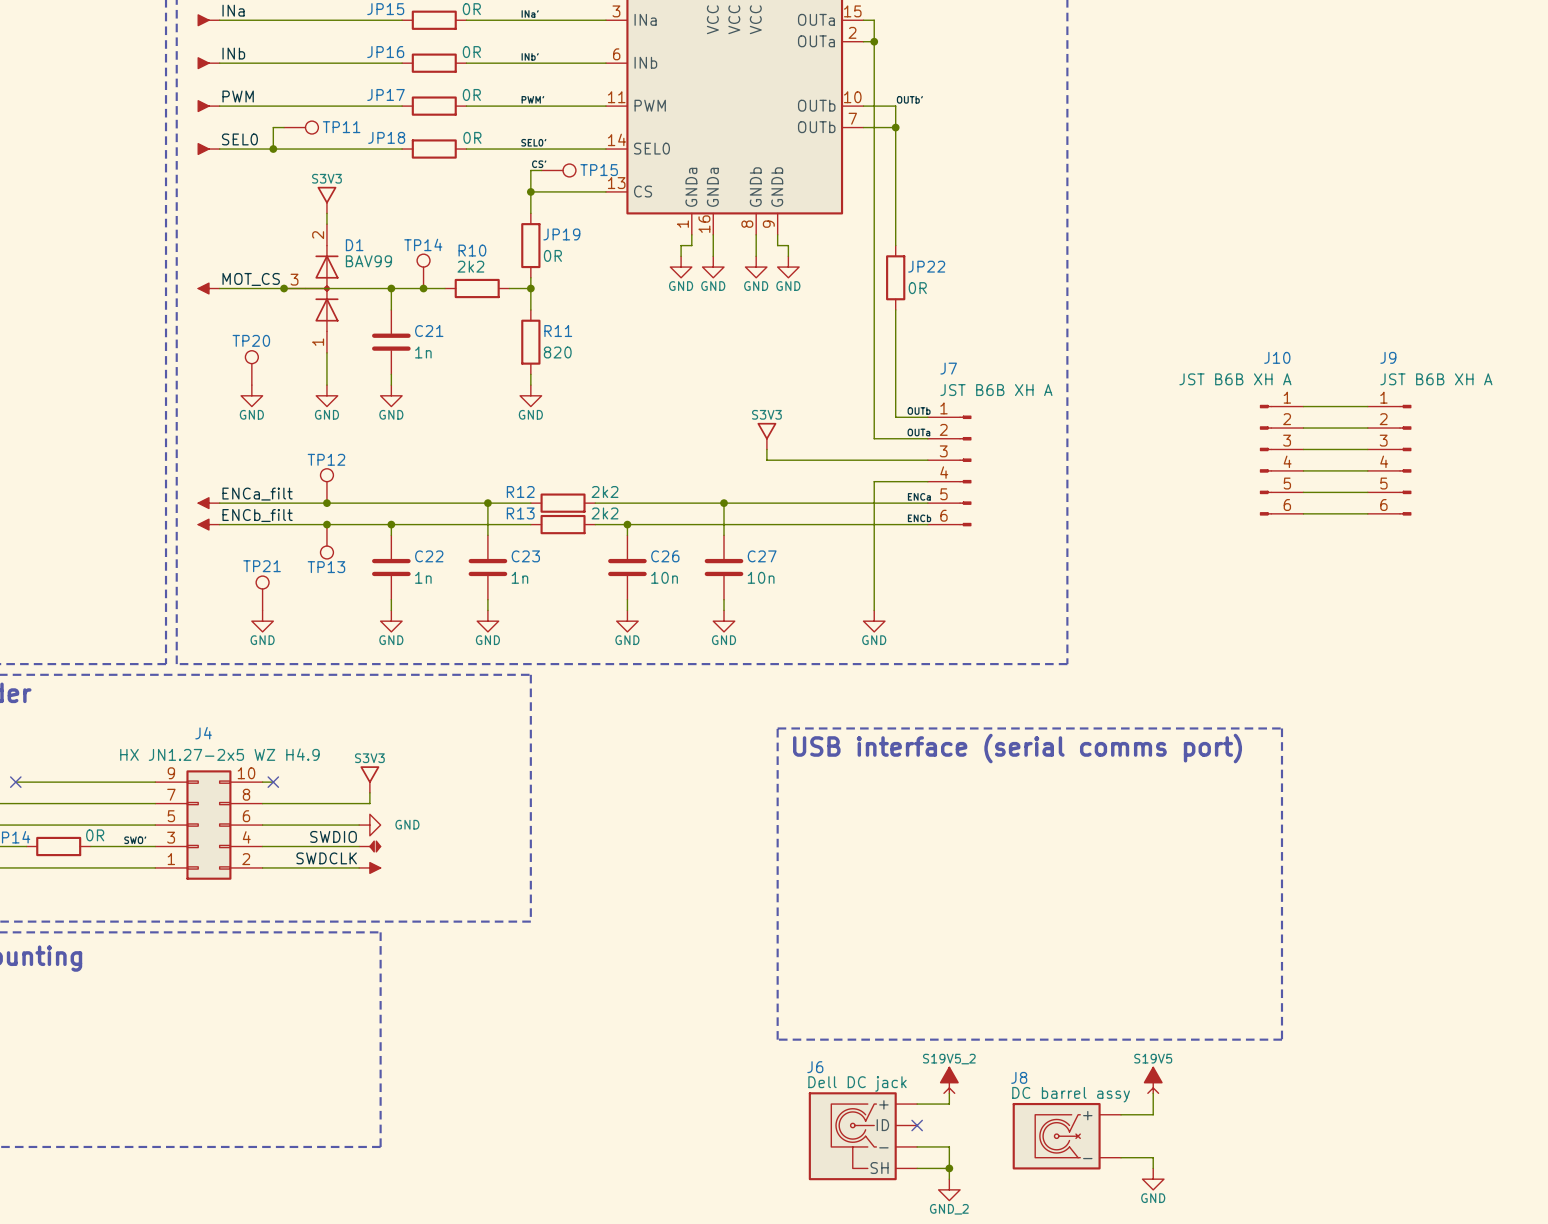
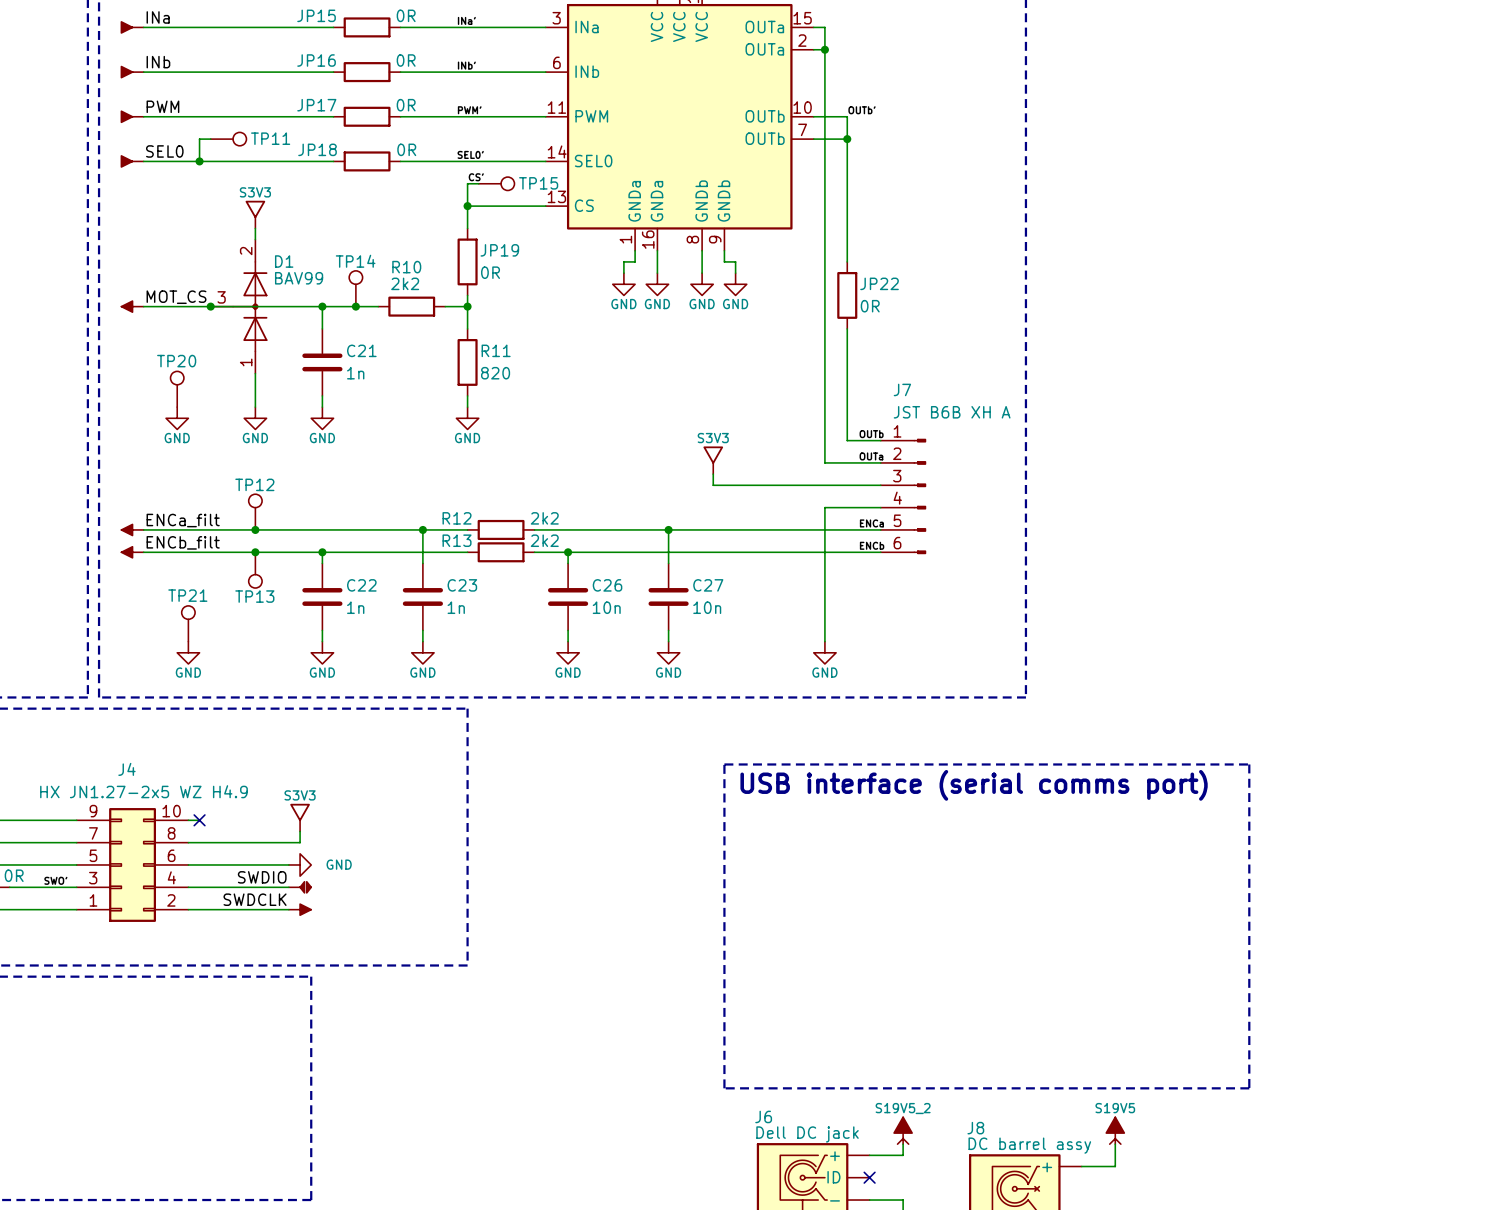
wire: (1303, 406) (1367, 406) -> none
wire: (1303, 428) (1367, 428) -> none
wire: (1303, 449) (1367, 449) -> none
J10: JST B6B XH A (1281, 460) -> none
J9: JST B6B XH A (1389, 460) -> none
wire: (1303, 470) (1367, 470) -> none
wire: (1303, 492) (1367, 492) -> none
wire: (1303, 513) (1367, 513) -> none

